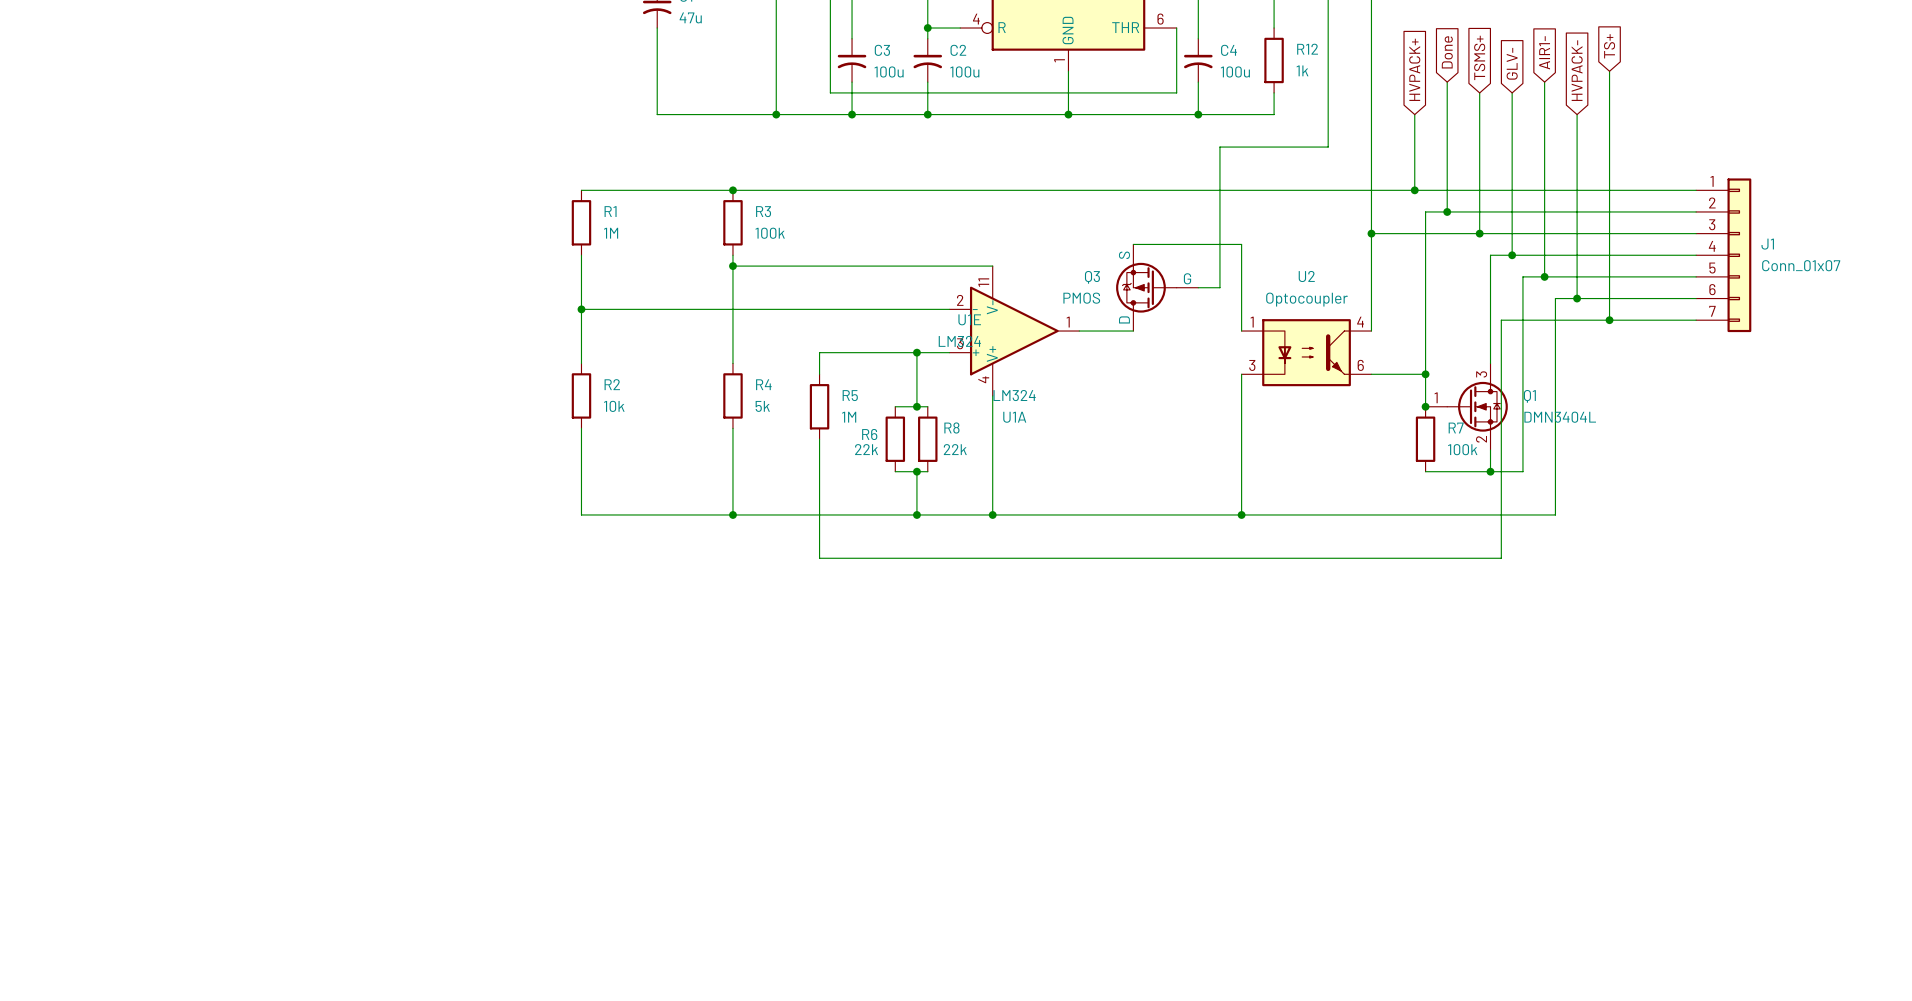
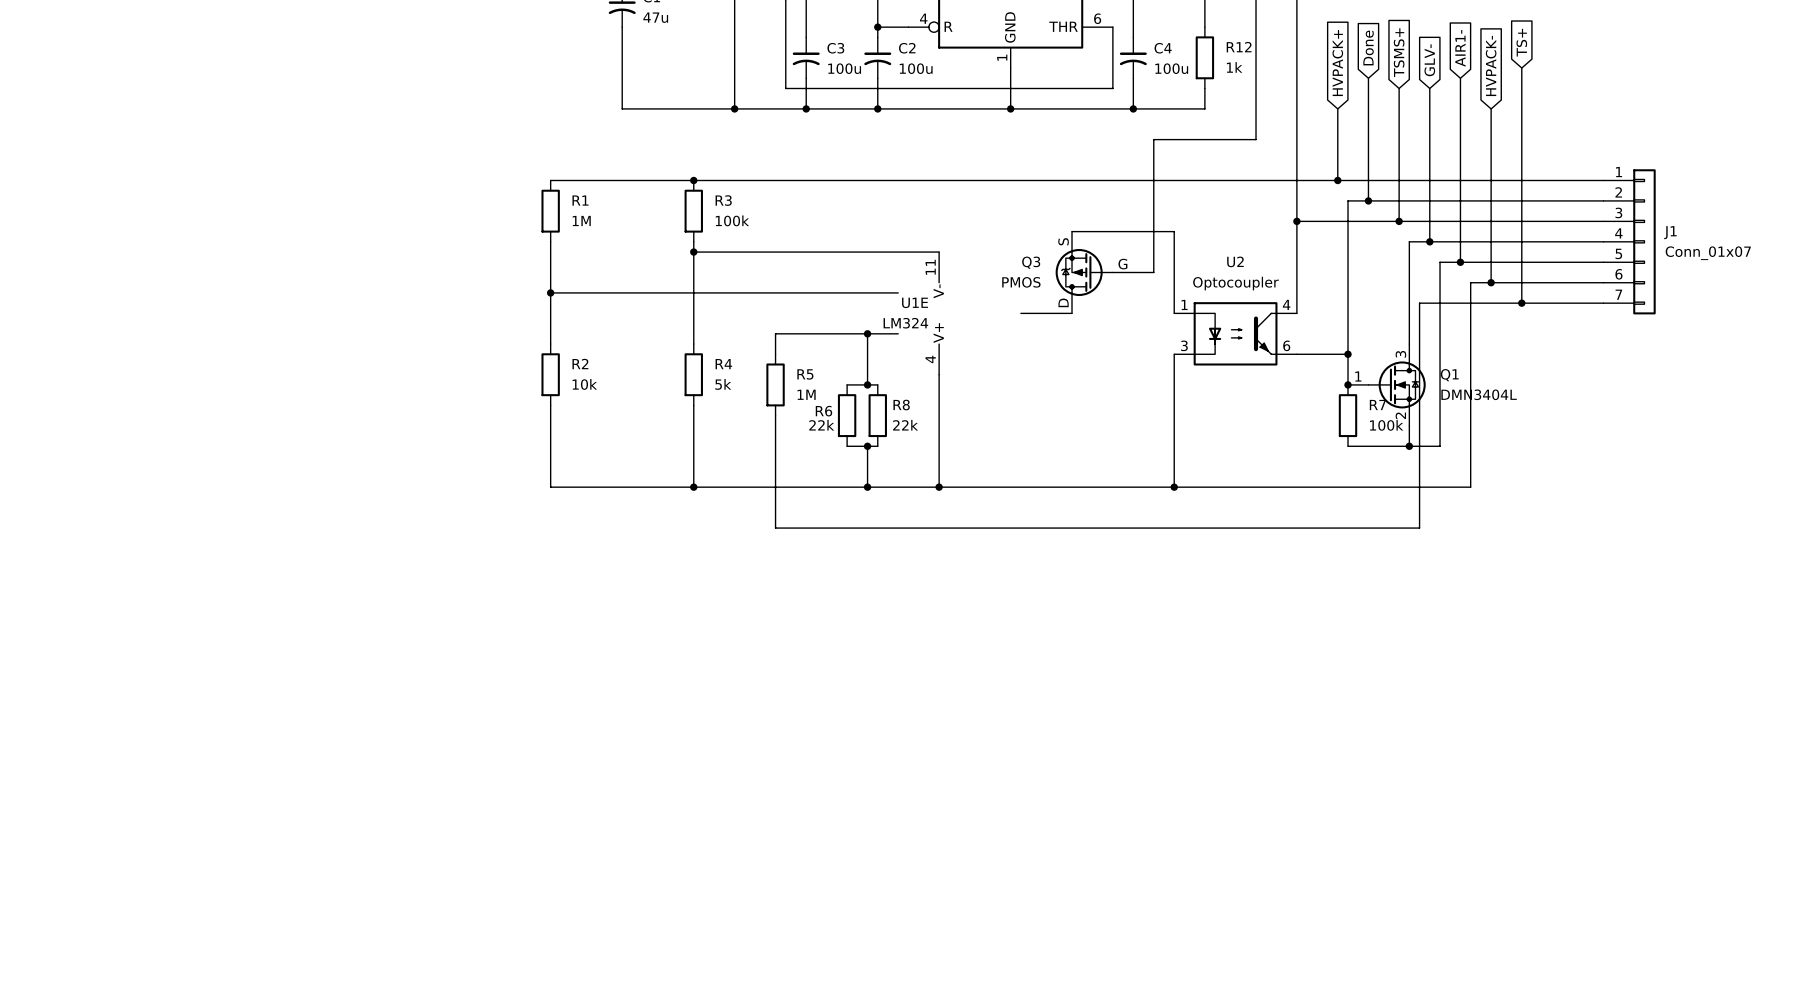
U1A: LM324 (1014, 331) -> none

